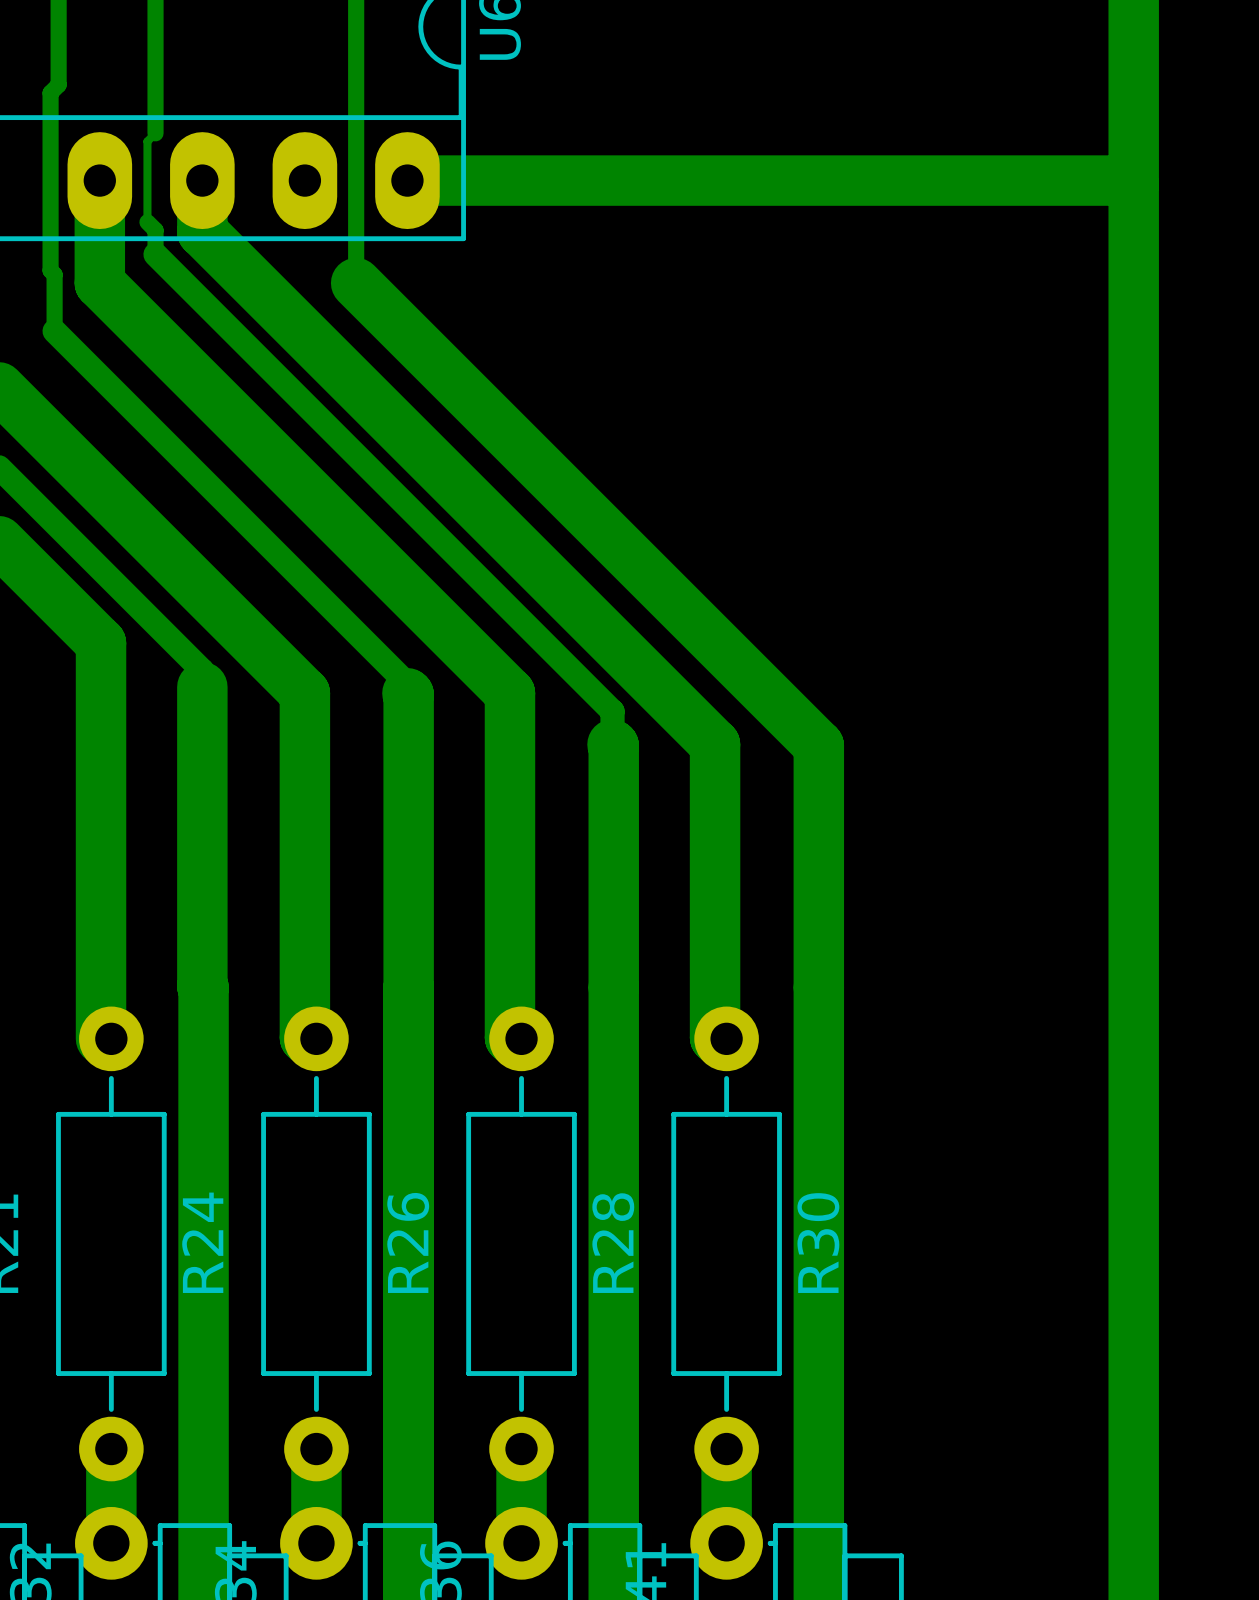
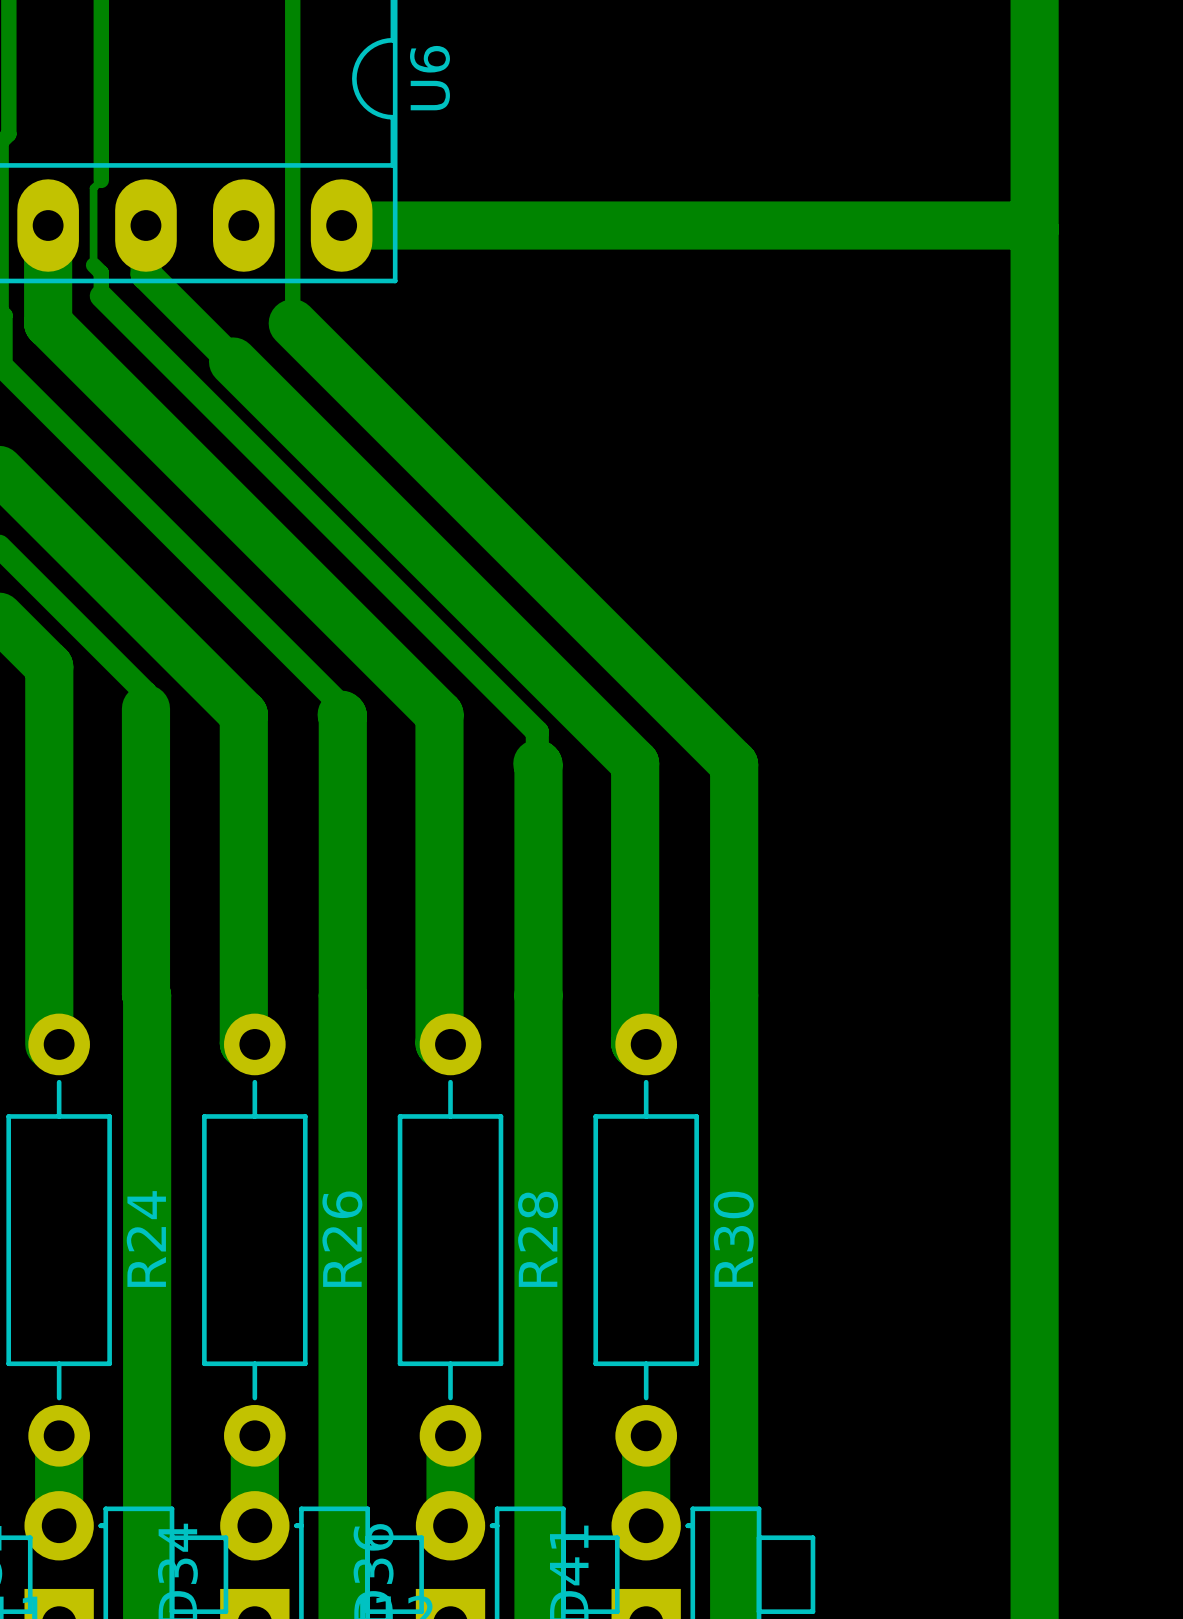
bottom track width: thick (202, 180) (202, 231) (293, 323) -> thin (145, 225) (145, 274) (233, 361)

